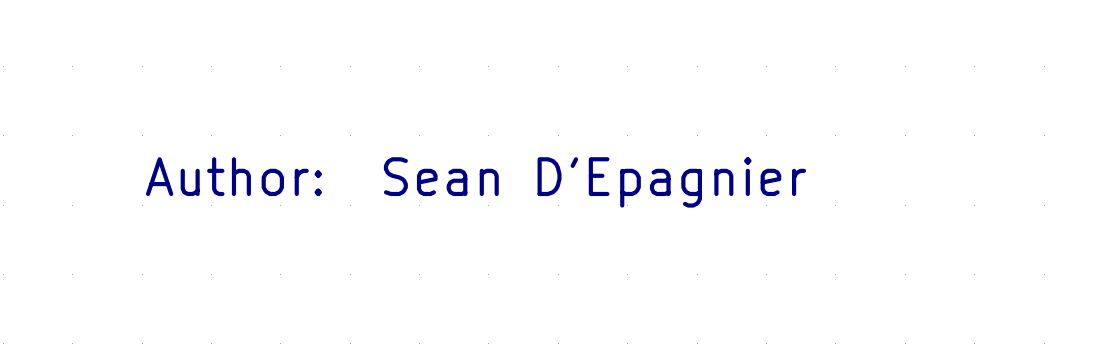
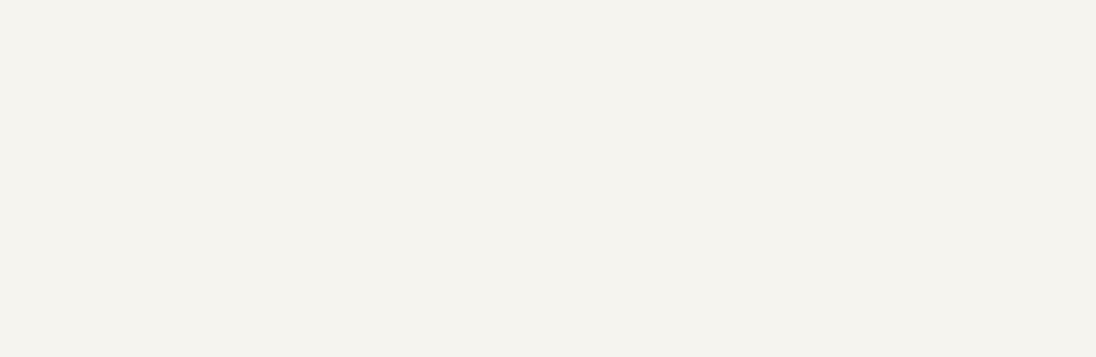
text: Author: Sean D'Epagnier (476, 182) -> none

